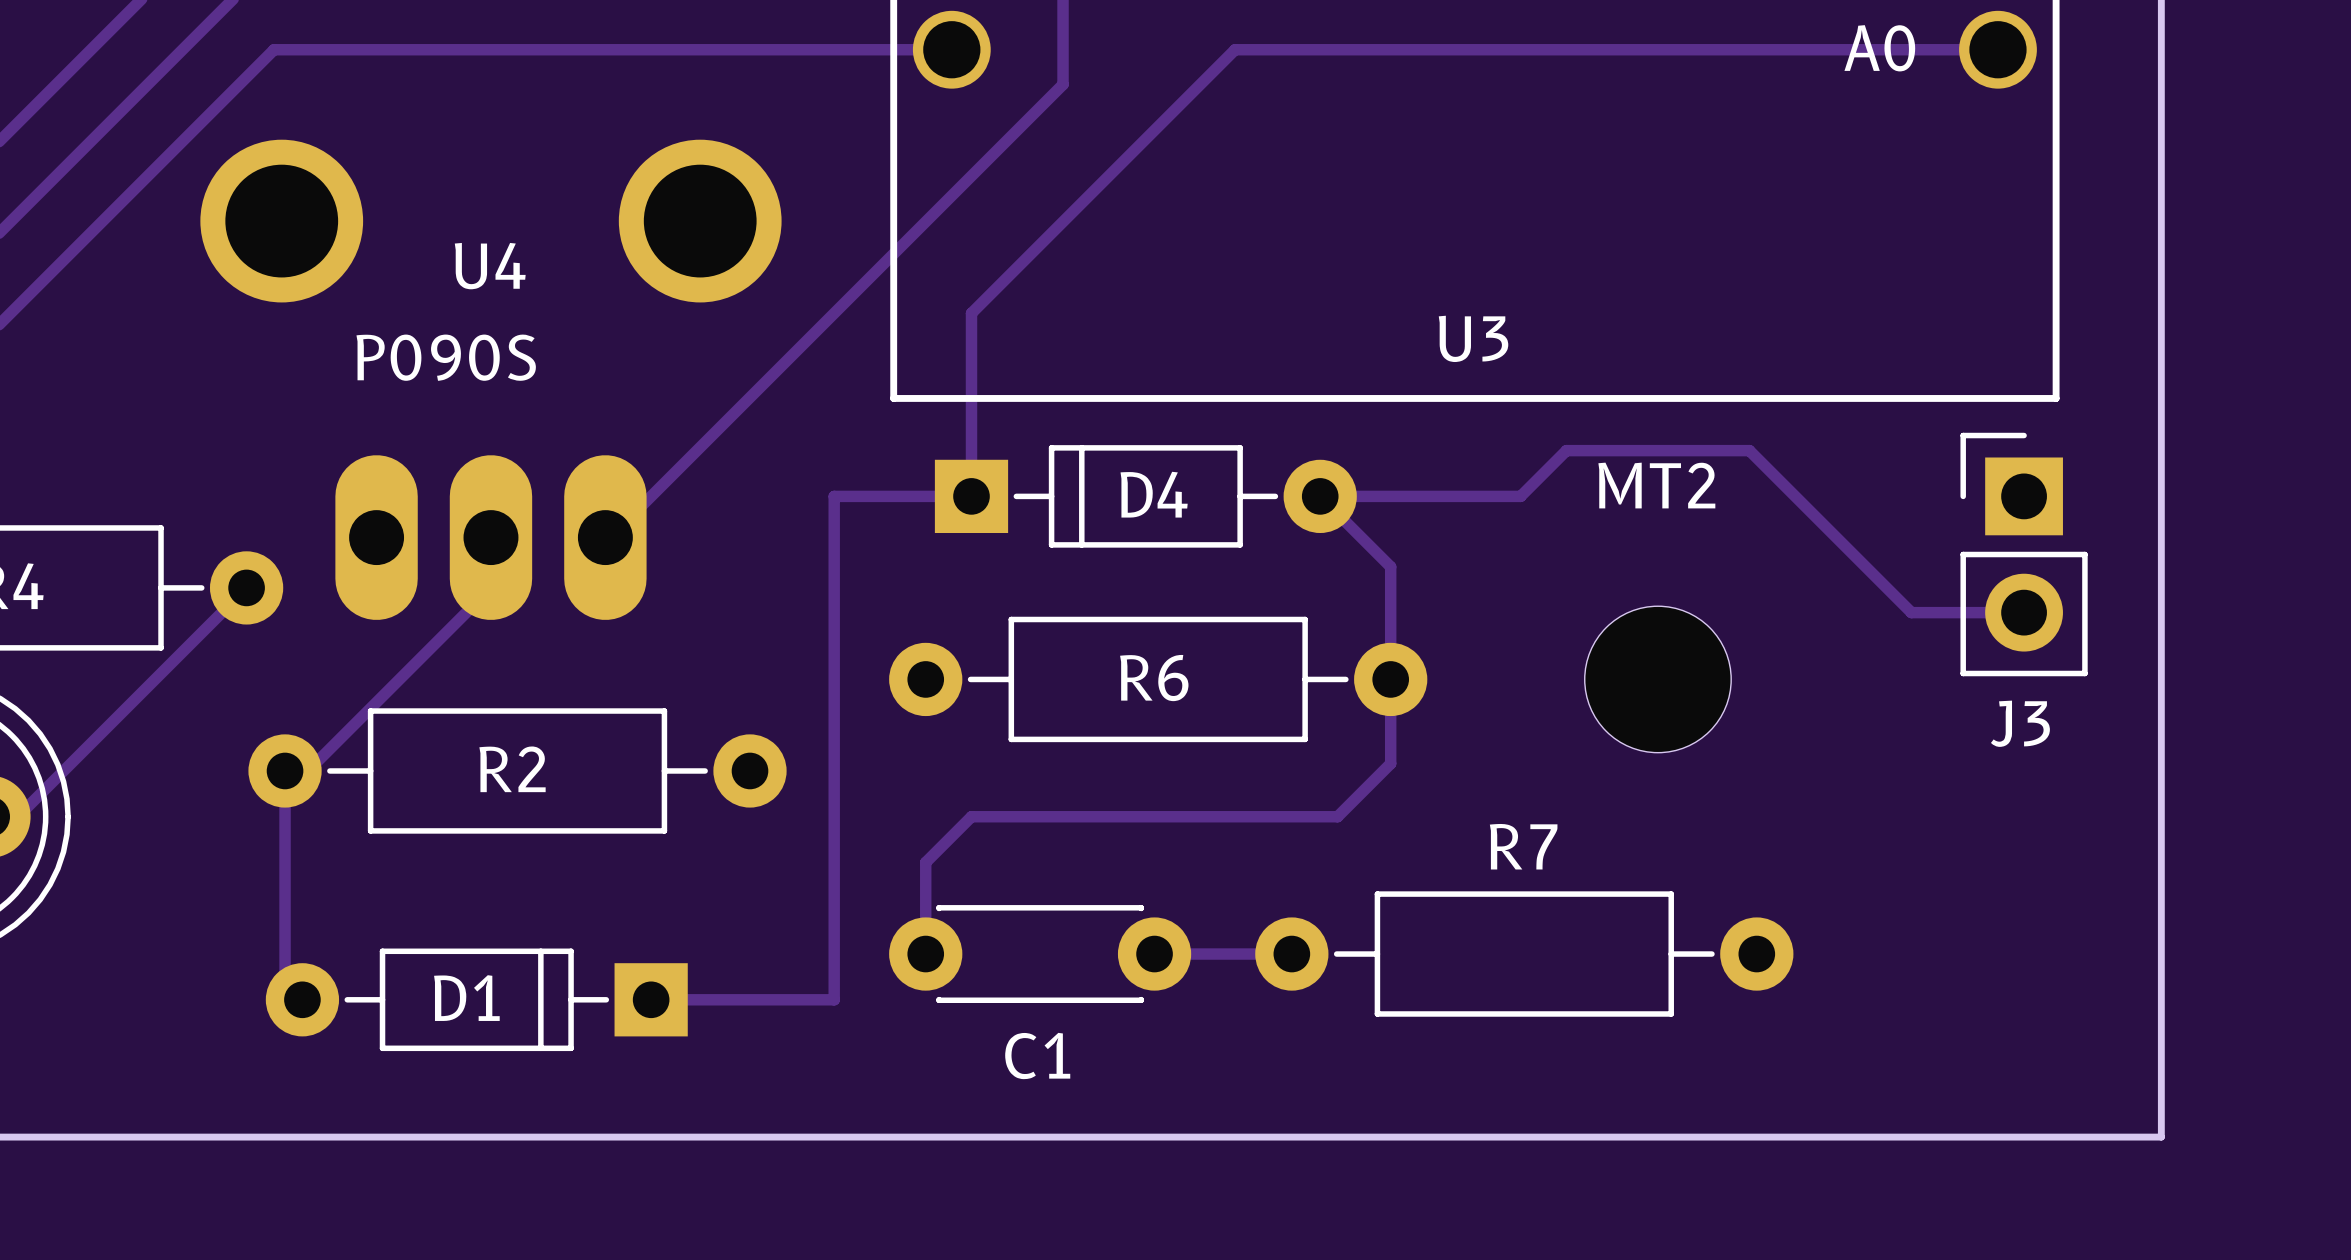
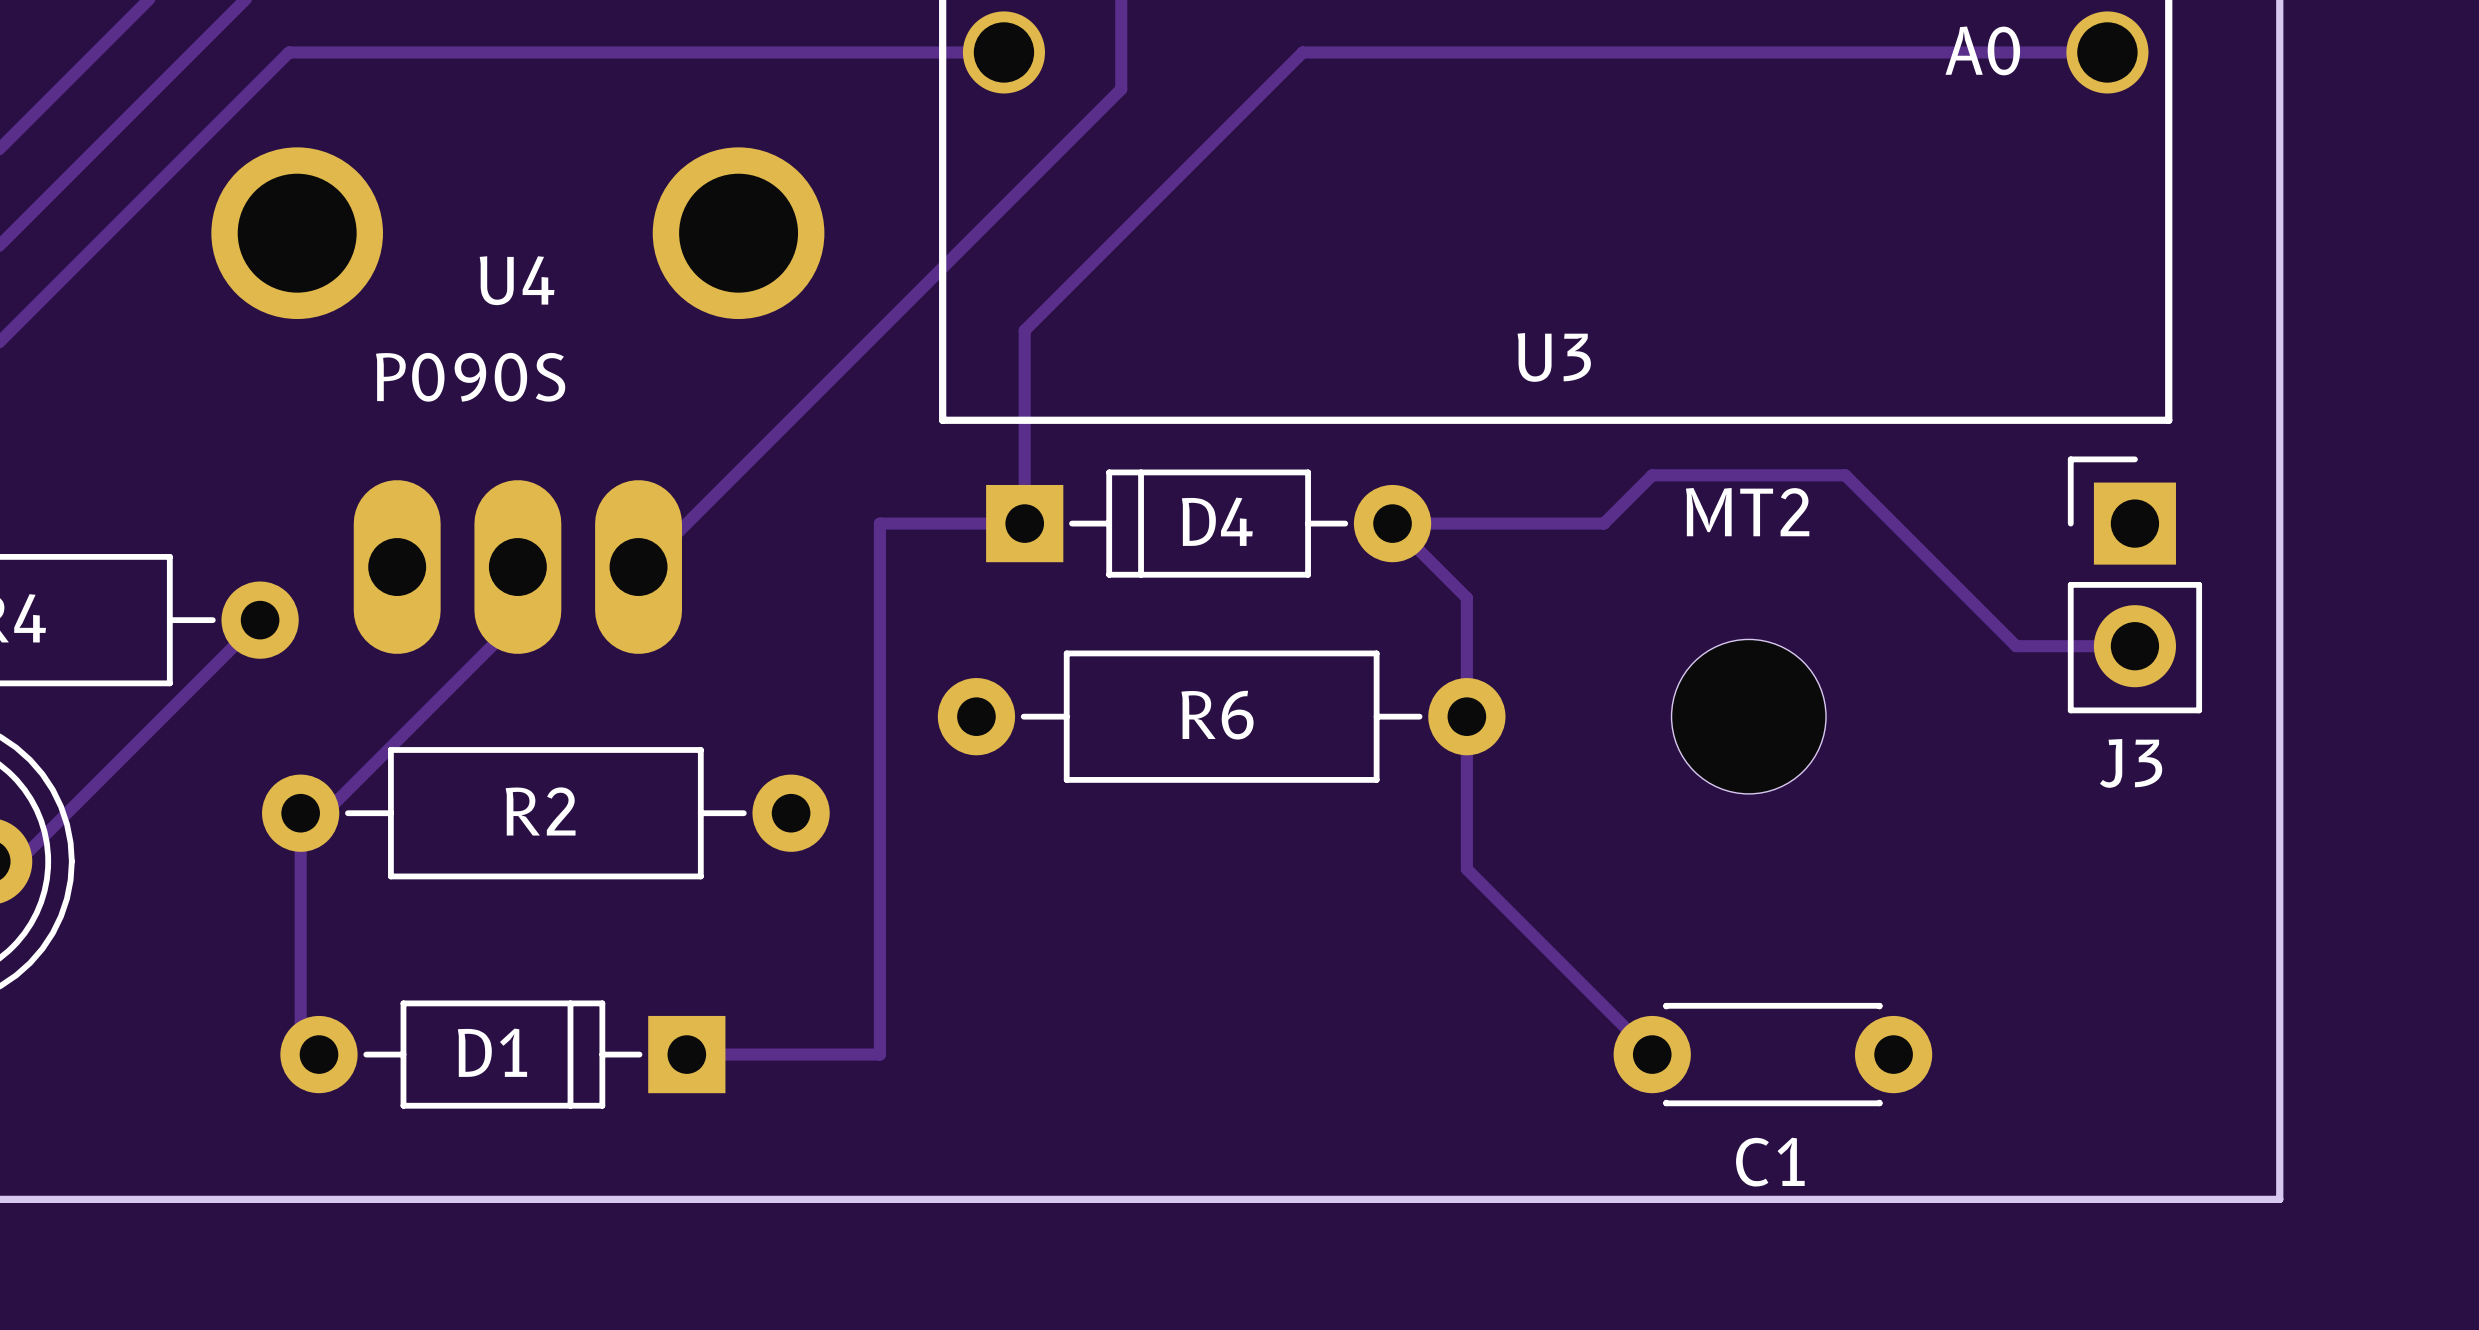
track: (1390, 763) (1337, 816) (971, 816) (925, 862) (925, 954) -> (1466, 805) (1466, 869) (1652, 1054)
C1 position: (1040, 954) -> (1772, 1054)
track: (1154, 954) (1291, 954) -> none
R7: (1524, 954) -> none

